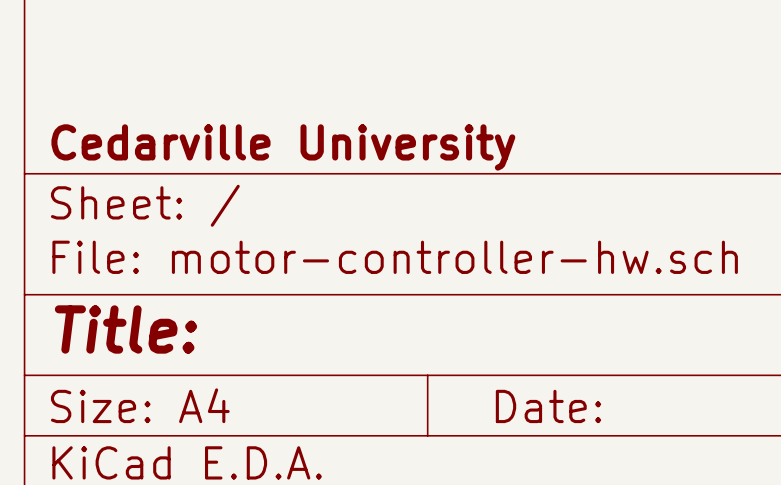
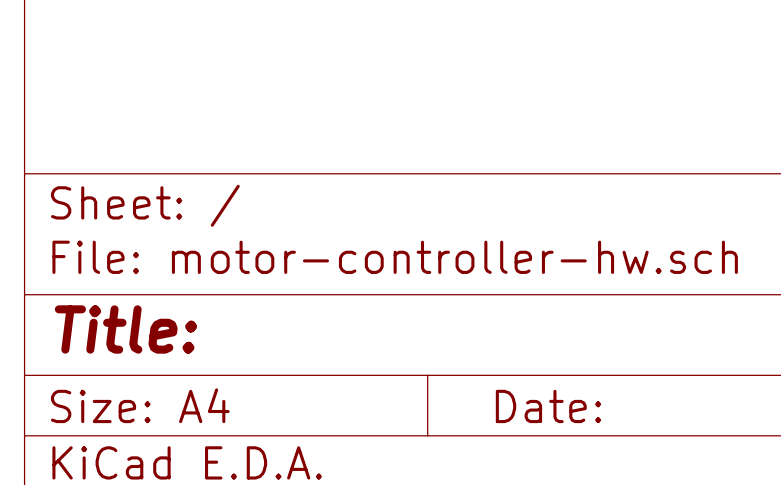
title block: Cedarville University (283, 147) -> none

